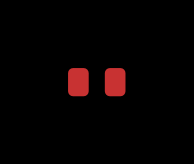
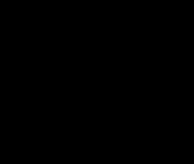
part: (96, 82) -> none

